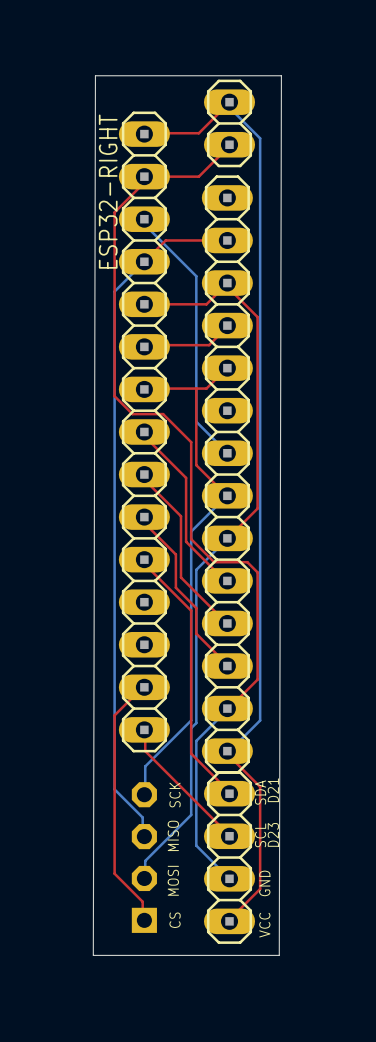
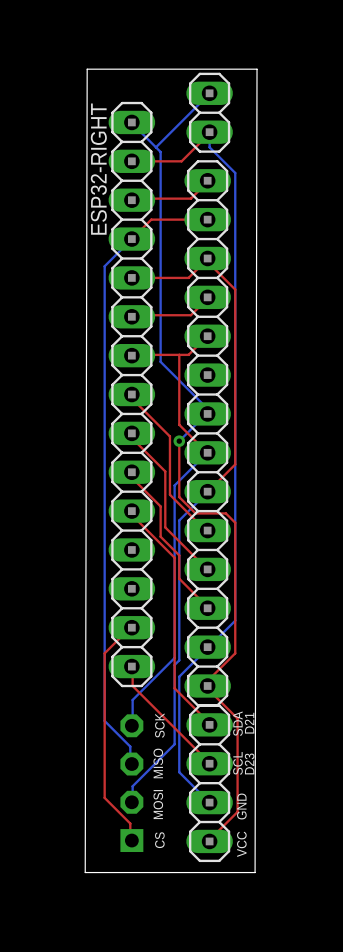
top track: (229, 102) (198, 133) (144, 134) -> none
bottom track: (229, 102) (229, 107) (260, 138) (260, 720) (227, 751) -> (209, 93) (155, 147)
bottom track: none -> (131, 122) (160, 152) (160, 361) (207, 408) (207, 413) (179, 441)
bottom track: none -> (209, 132) (209, 147) (235, 172) (235, 620) (207, 647)
top track: (144, 176) (142, 176) (142, 184) (114, 212) (114, 396) (132, 414) (163, 414) (191, 442) (191, 539) (196, 544) -> (179, 441) (179, 497)
top track: none -> (207, 180) (190, 198) (132, 198) (131, 200)
bottom track: (144, 219) (145, 225) (196, 276) (196, 421) (226, 452) -> none
via: none -> (179, 441)
top track: (257, 679) (227, 708) -> (235, 620) (235, 653) (209, 679) (209, 686)

